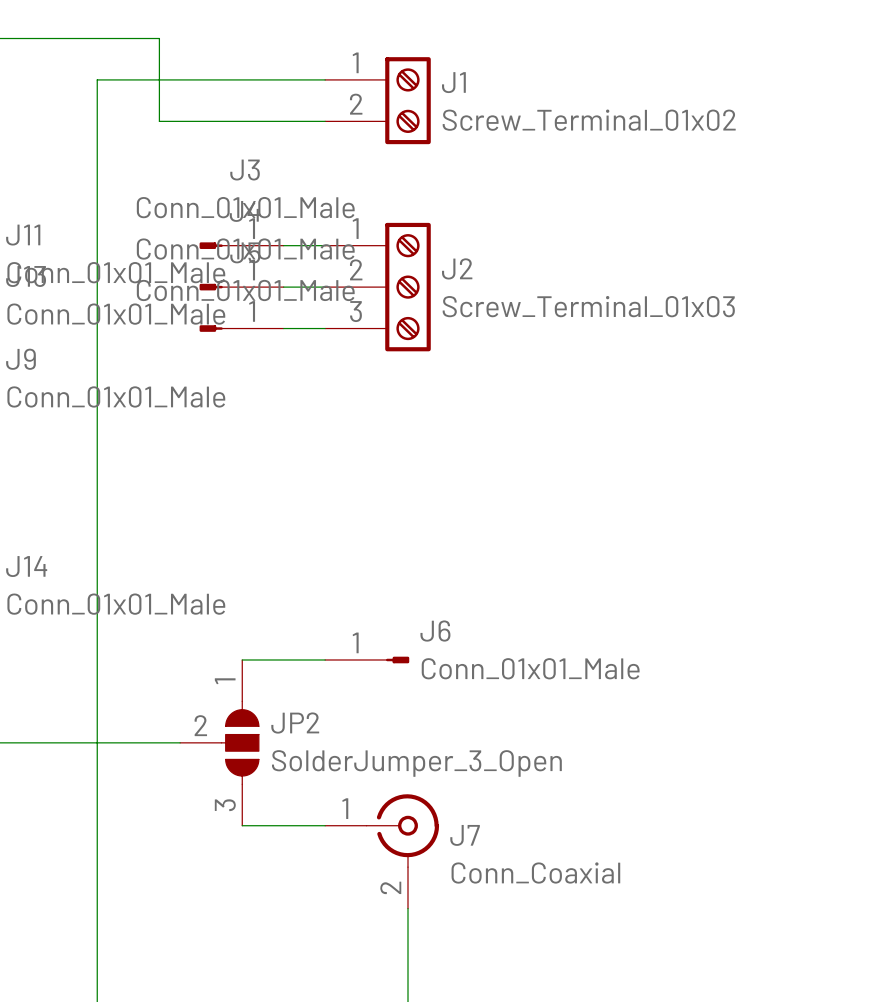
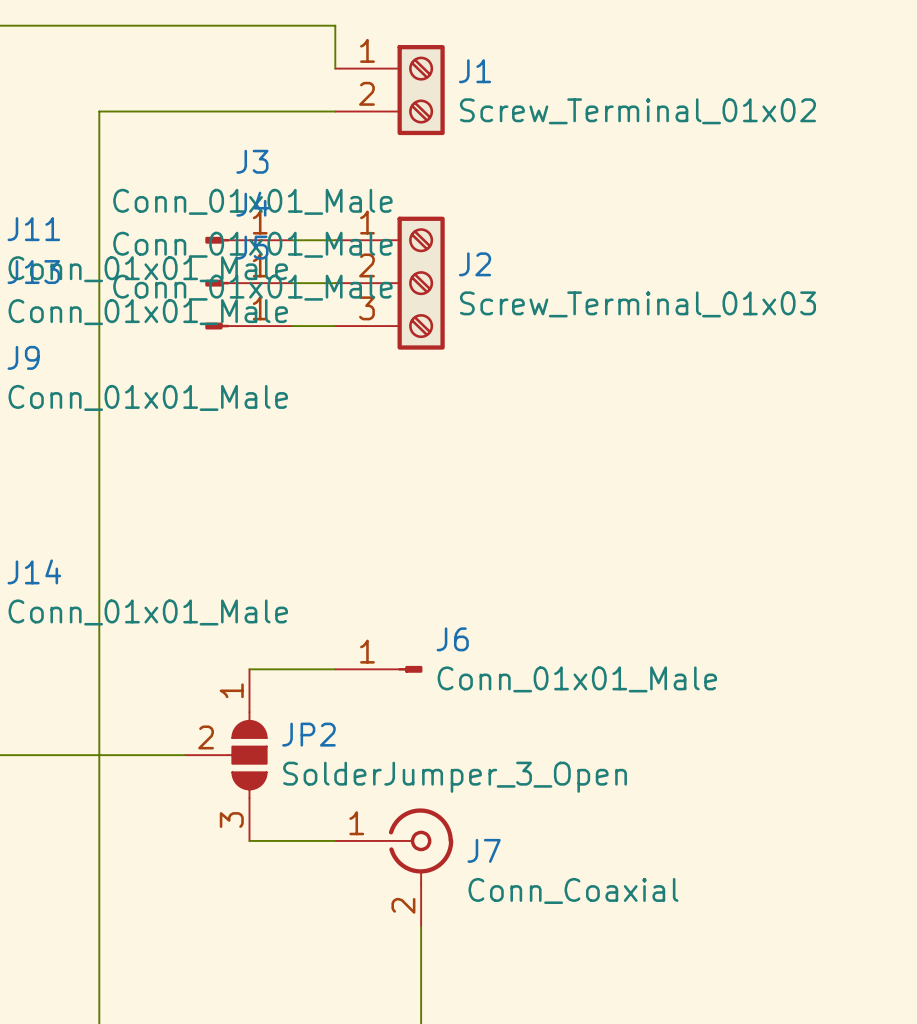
wire: (159, 38) (159, 121) -> (99, 111) (163, 111)
wire: (325, 79) (97, 79) (97, 121) -> (335, 68) (335, 25) (163, 25)

